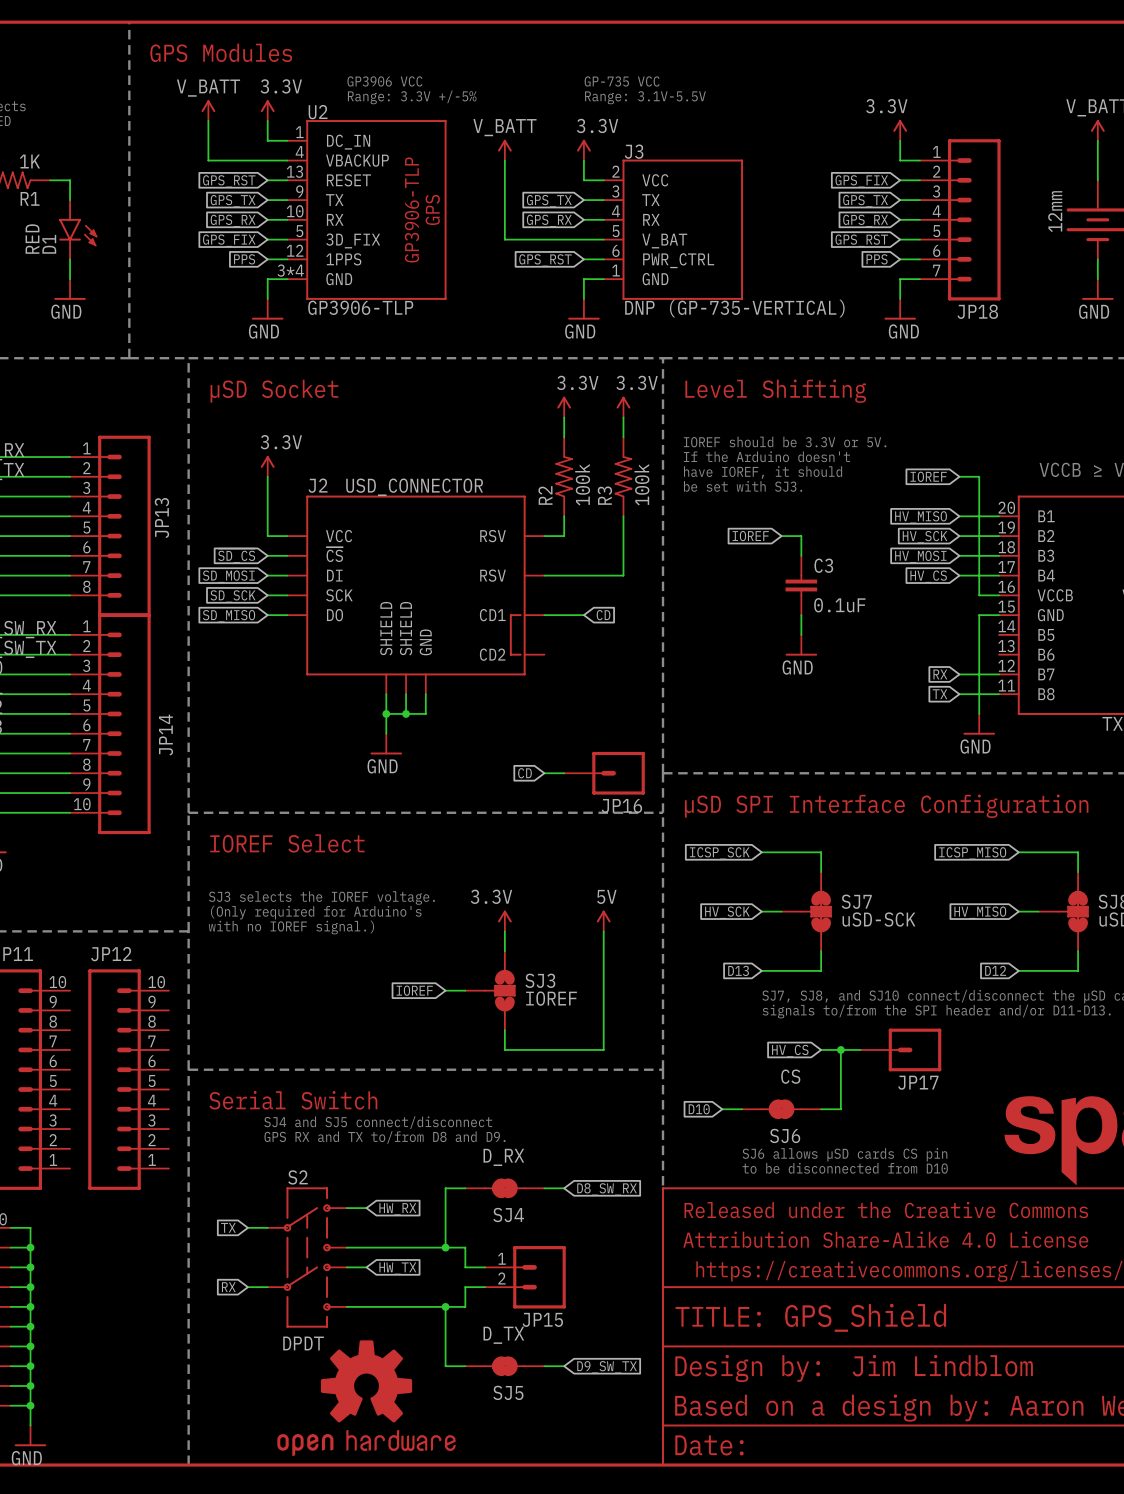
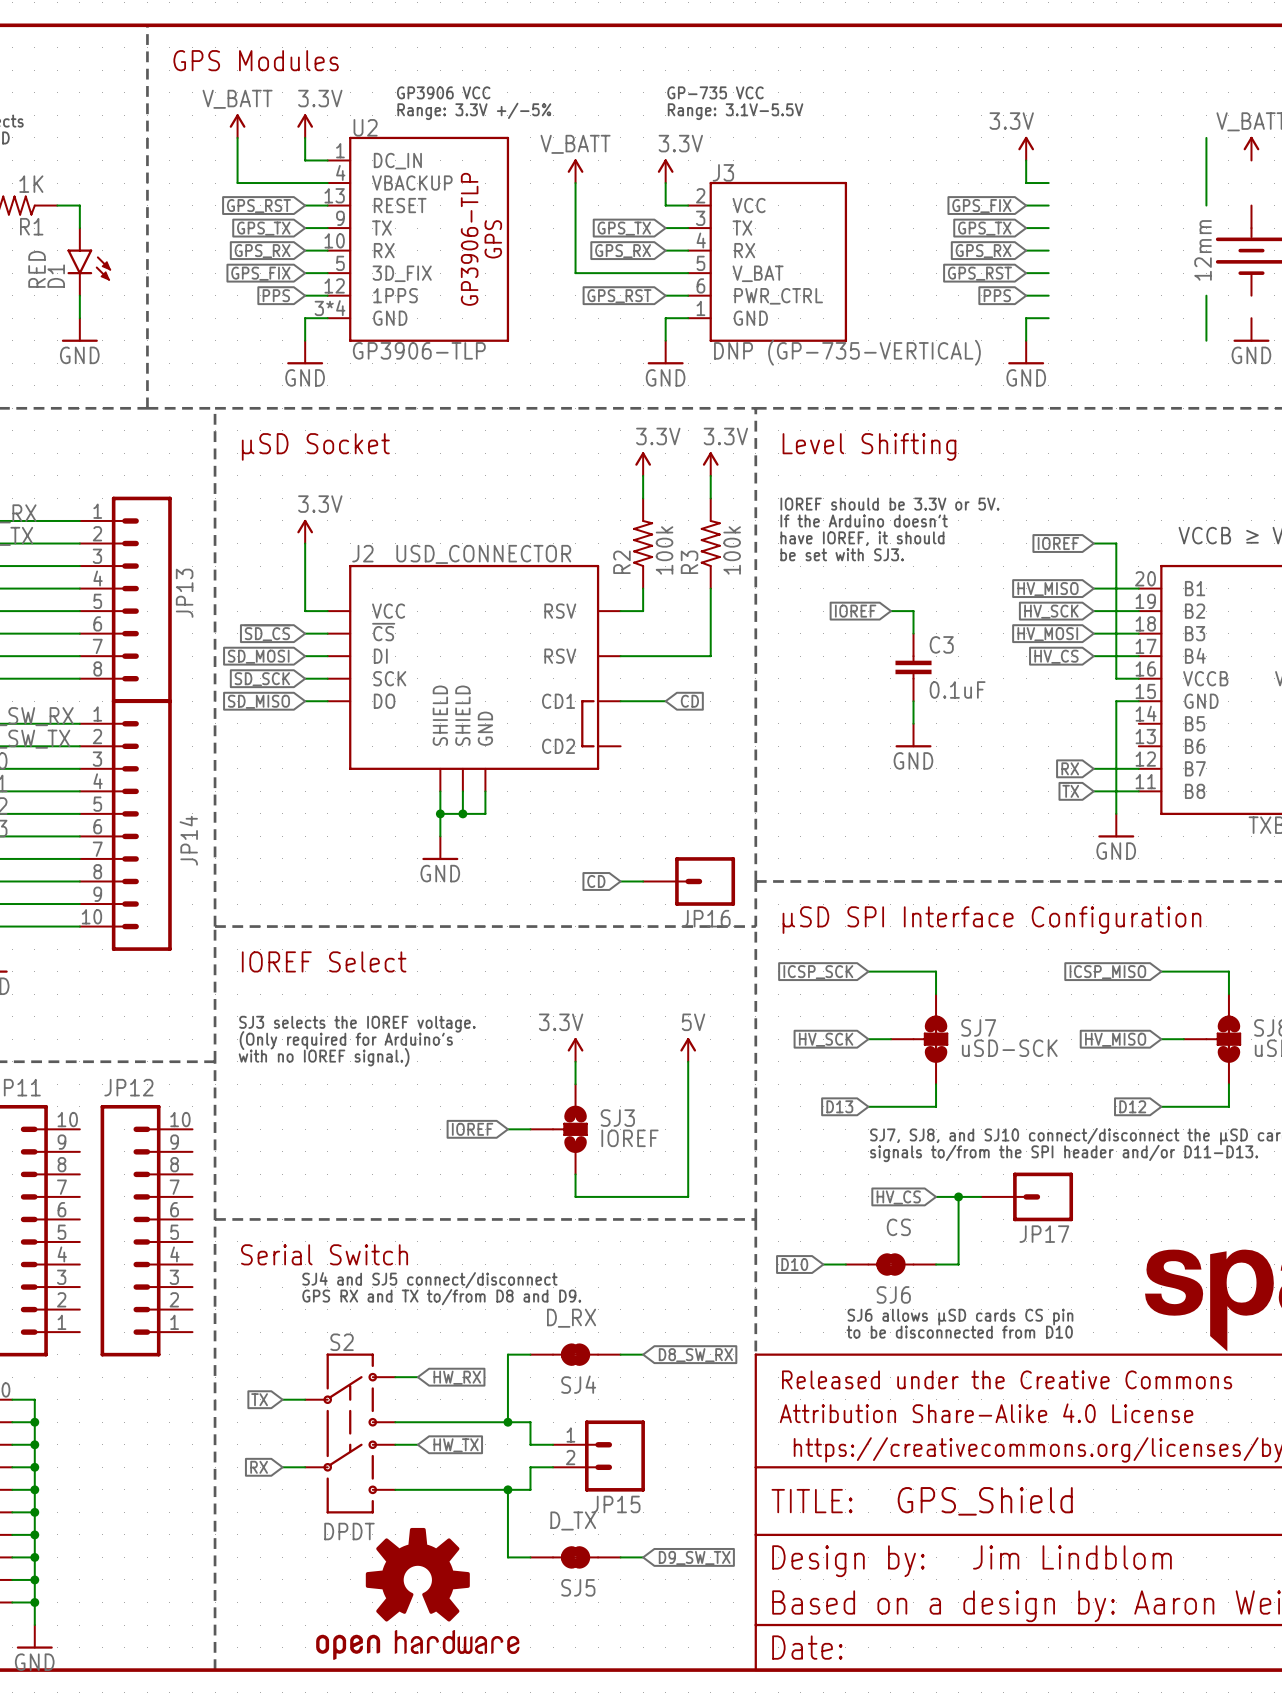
wire: none -> (1206, 137) (1206, 205)
wire: (1097, 140) (1097, 180) -> (1206, 295) (1206, 340)
JP18: (960, 219) -> none
wire: (1097, 259) (1097, 279) -> none

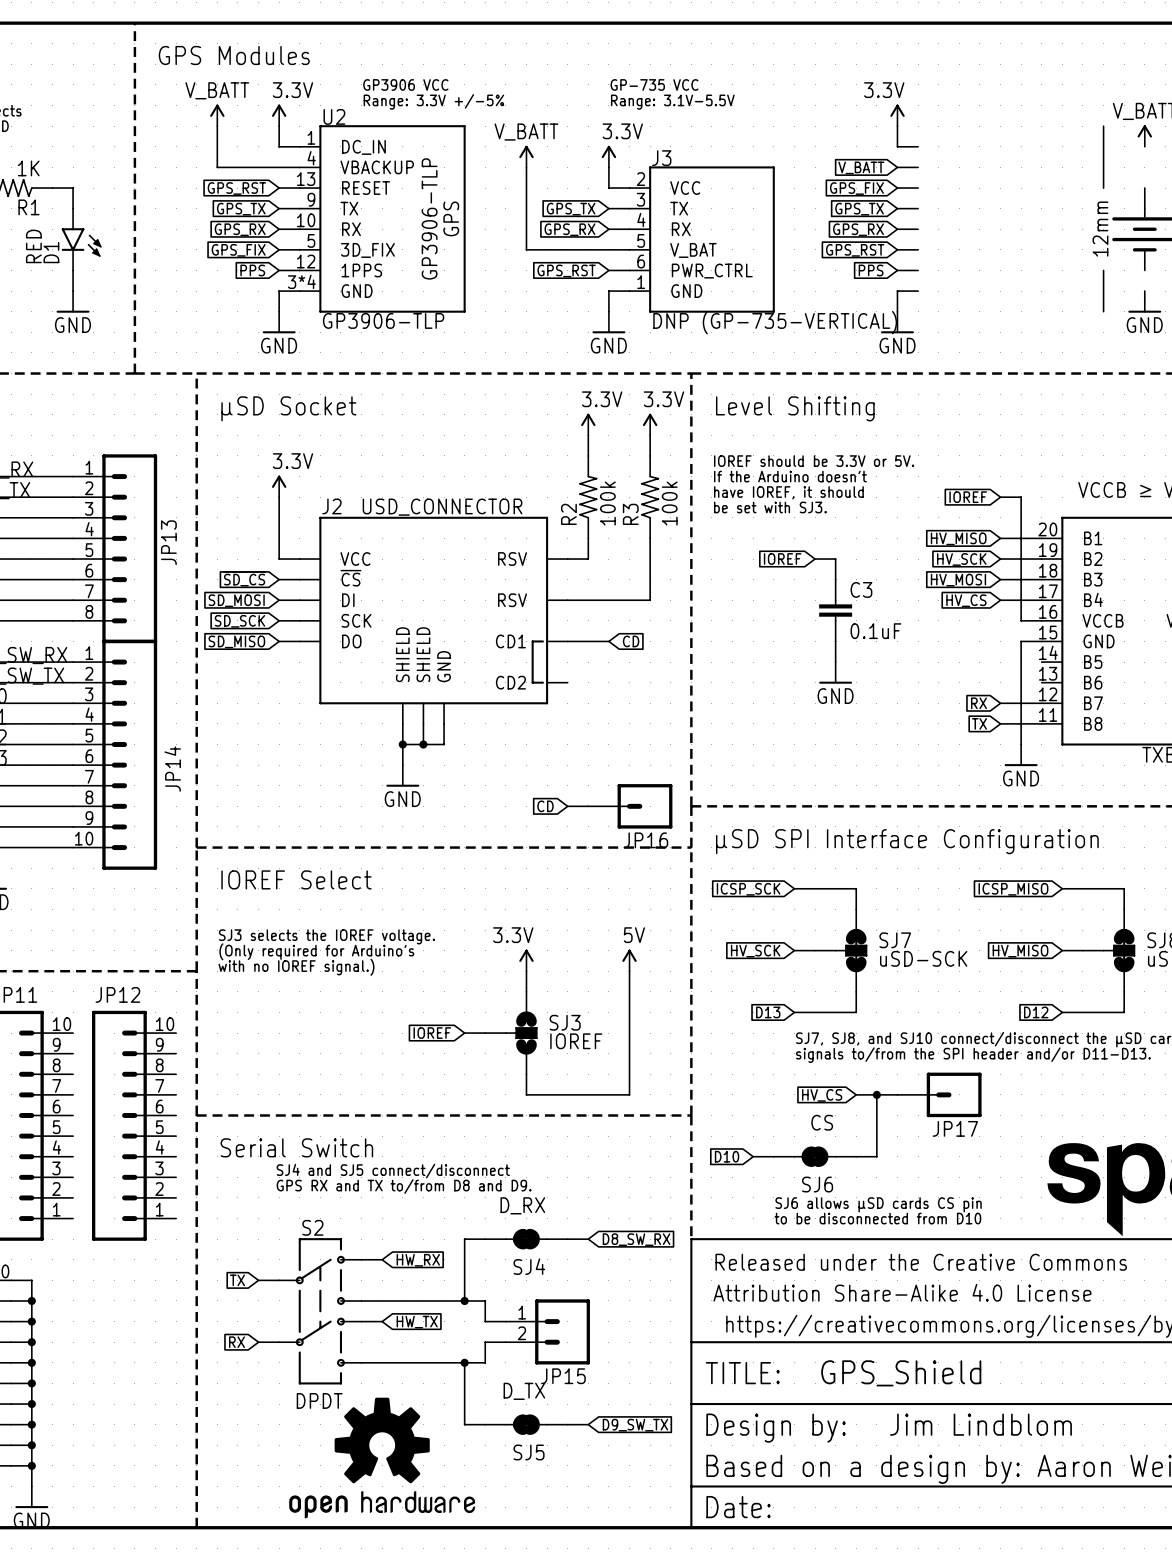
power symbol position: 3.3V (1026, 148) -> 3.3V (897, 115)
wire: (1026, 160) (1026, 183) (1048, 183) -> (897, 126) (897, 146) (918, 146)
global label: none -> V_BATT (861, 167)
wire: none -> (897, 167) (918, 167)
wire: (1026, 205) (1048, 205) -> (897, 188) (918, 188)
global label position: GPS_FIX (981, 206) -> GPS_FIX (856, 188)
global label position: GPS_TX (984, 228) -> GPS_TX (859, 209)
wire: (1026, 228) (1048, 228) -> (897, 208) (918, 208)
wire: (1026, 250) (1048, 250) -> (897, 229) (918, 229)
global label position: GPS_RX (983, 251) -> GPS_RX (858, 229)
global label position: GPS_RST (979, 273) -> GPS_RST (855, 250)
wire: (1026, 273) (1048, 273) -> (897, 249) (918, 249)
global label position: PPS (997, 295) -> PPS (871, 270)
wire: (1026, 295) (1048, 295) -> (897, 270) (918, 270)
wire: (1048, 318) (1026, 318) (1026, 340) -> (918, 291) (897, 291) (897, 311)
power symbol position: GND (1026, 352) -> GND (897, 322)

